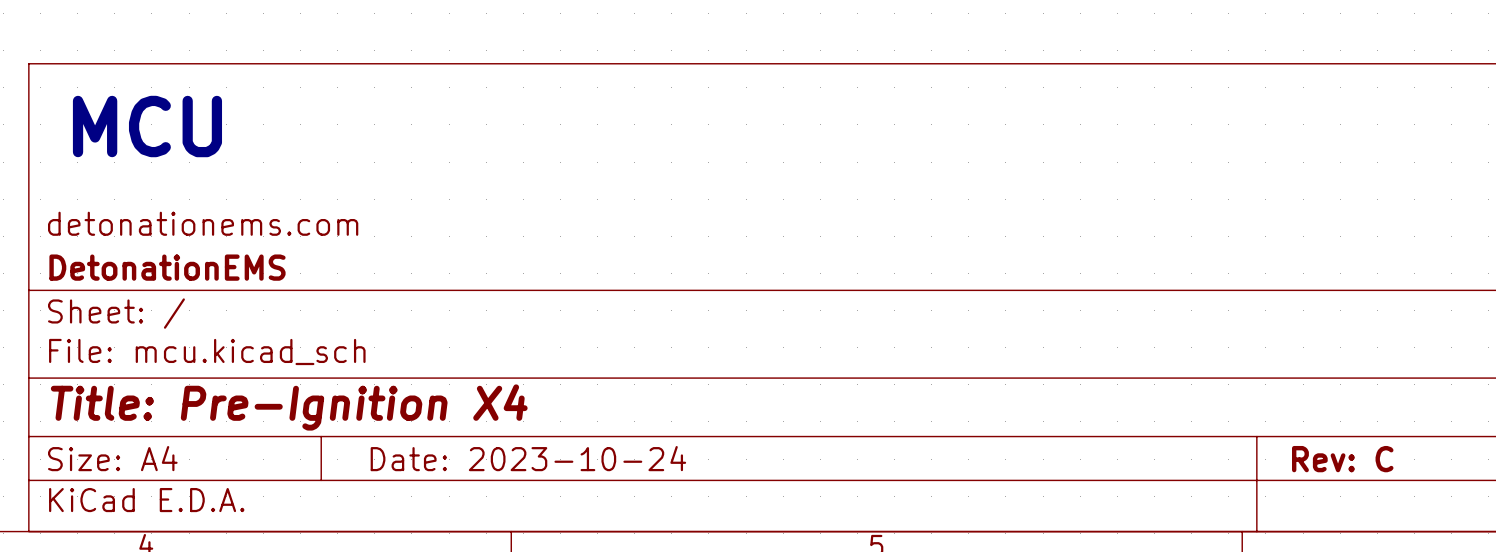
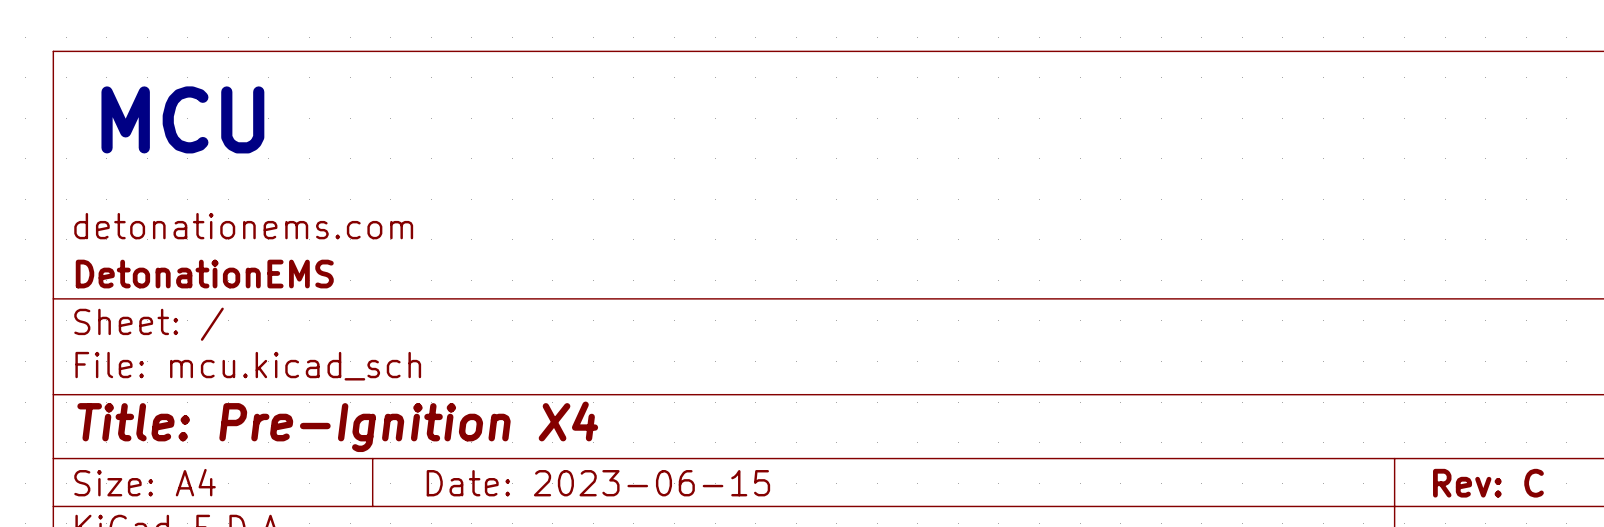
title block: Date: 2023-10-24 (528, 458) -> Date: 2023-06-15 (598, 483)

